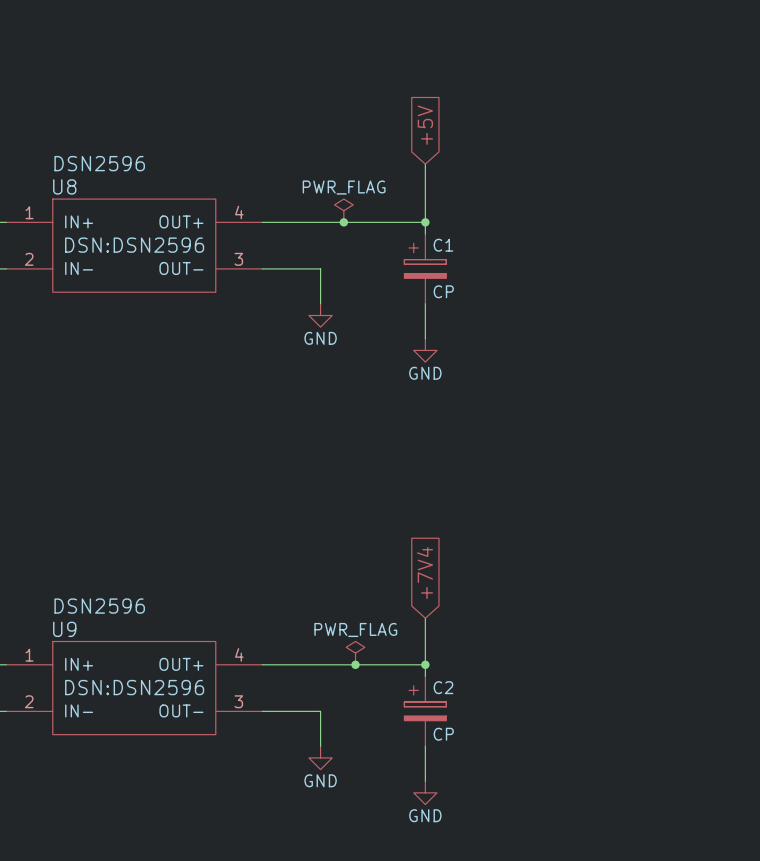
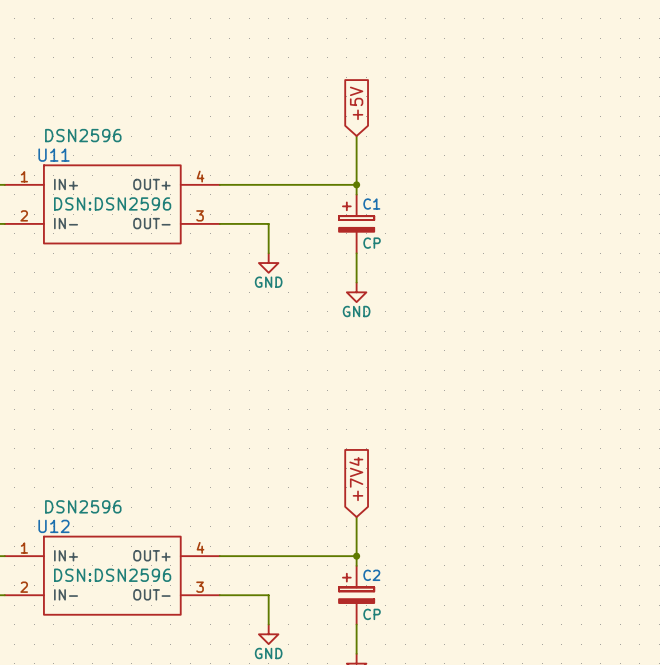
U8 name: U8 (64, 186) -> U11 (54, 155)
power symbol: PWR_FLAG (343, 210) -> none
junction: (343, 222) -> none
U9 name: U9 (64, 629) -> U12 (54, 526)
power symbol: PWR_FLAG (355, 653) -> none
junction: (355, 664) -> none

